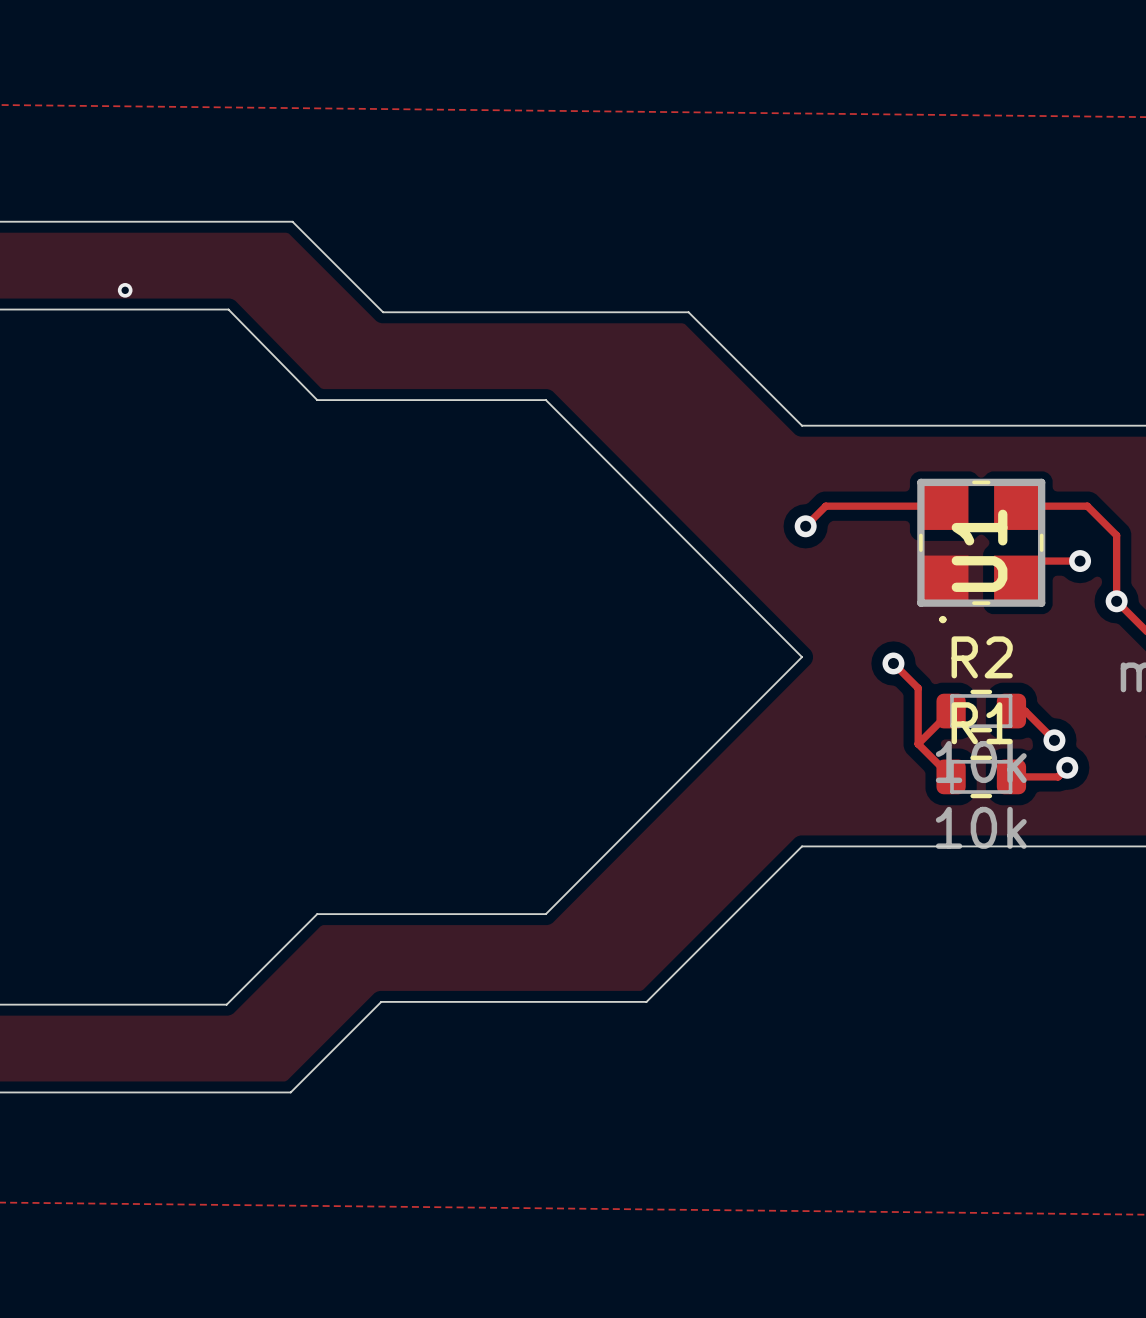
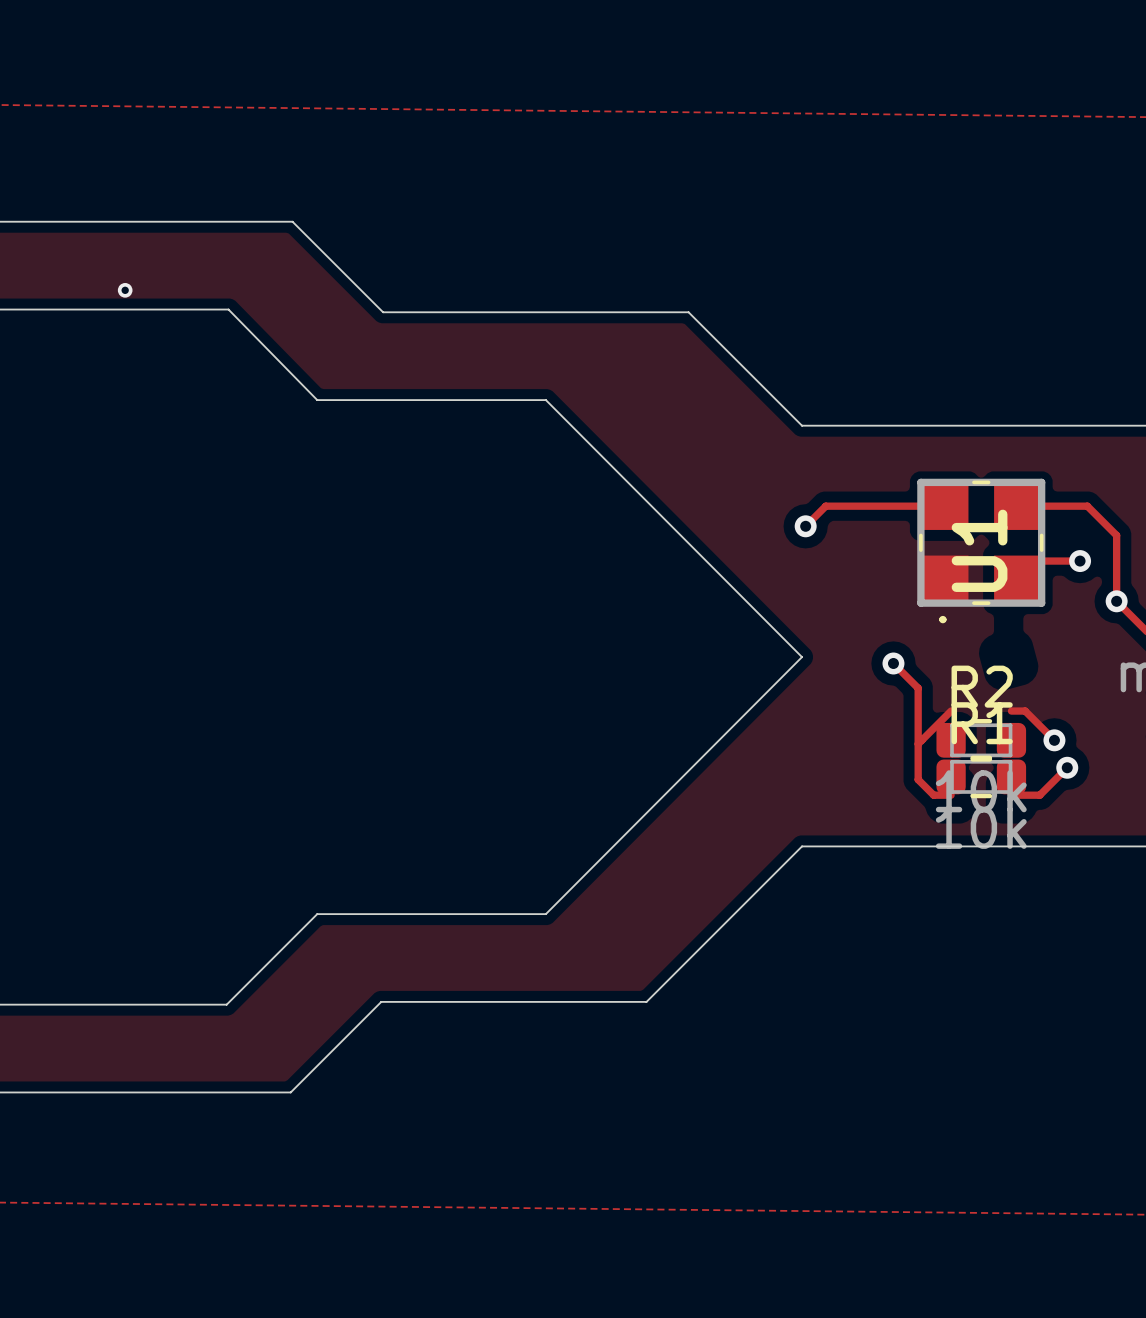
R2 position: (981, 711) -> (981, 740)
track: (918, 743) (951, 776) -> (918, 743) (918, 779) (933, 795) (951, 795)
track: (1011, 776) (1058, 776) -> (1011, 795) (1039, 795) (1058, 776)

